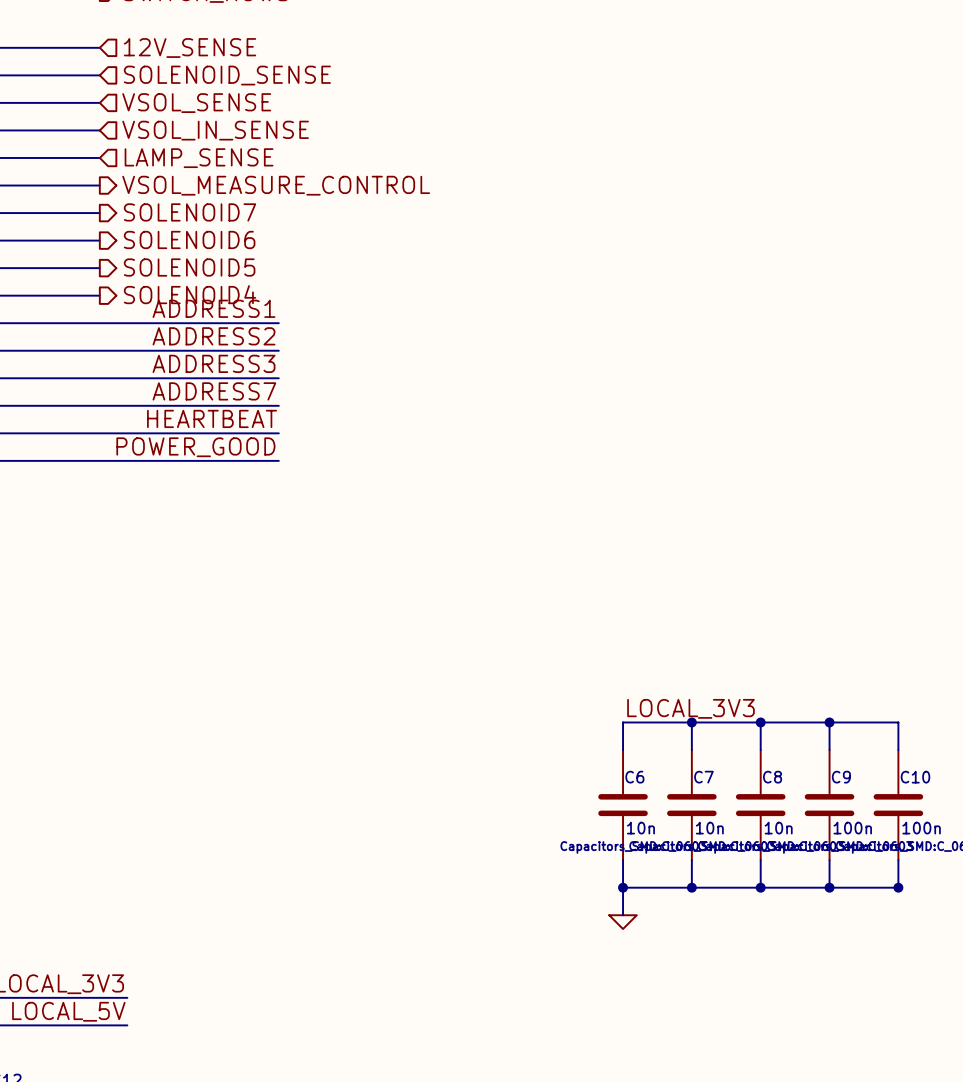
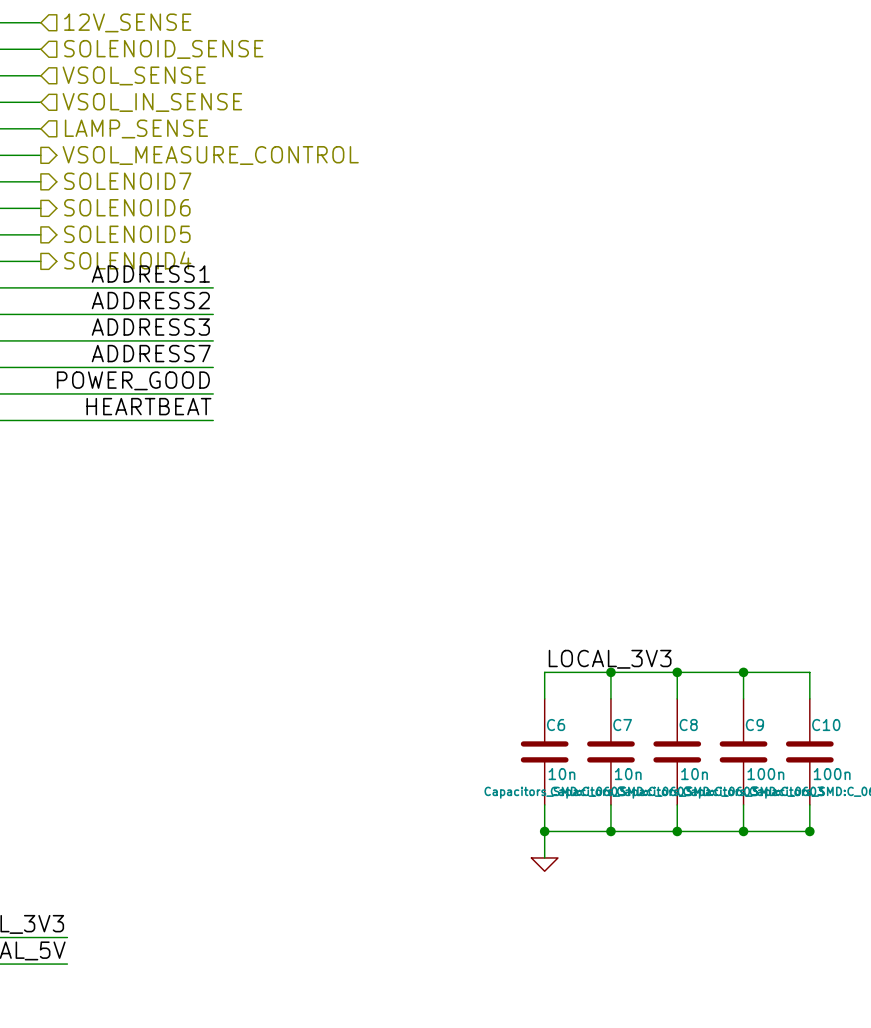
label: HEARTBEAT (212, 418) -> POWER_GOOD (133, 380)
label: POWER_GOOD (195, 447) -> HEARTBEAT (148, 406)

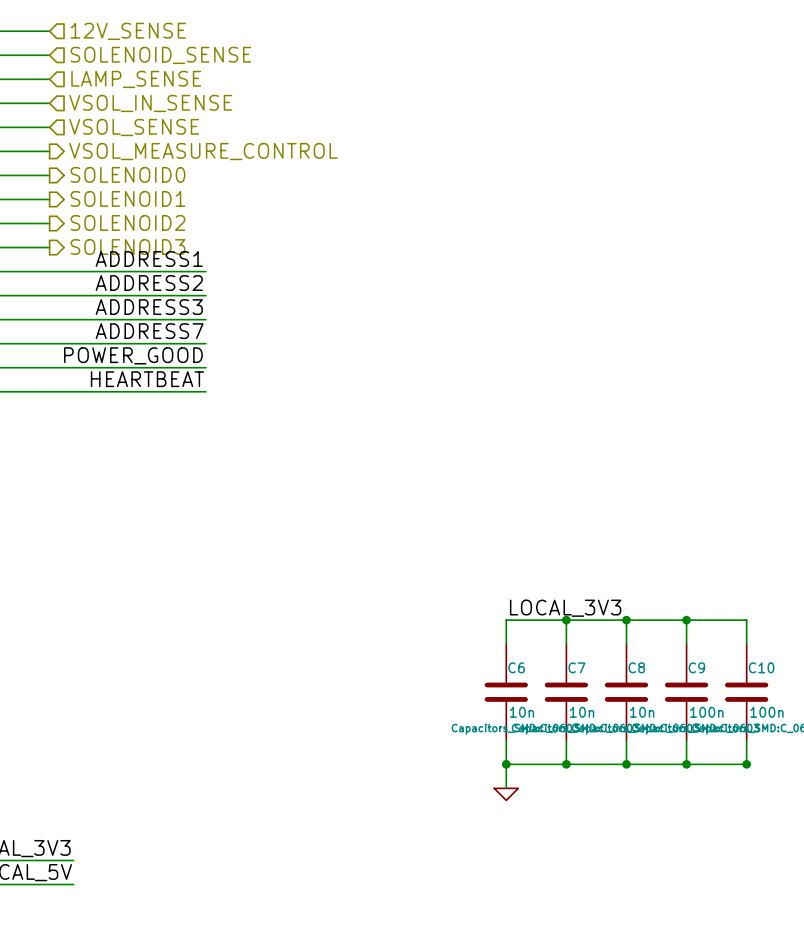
hierarchical label: VSOL_SENSE (134, 75) -> LAMP_SENSE (136, 79)
hierarchical label: LAMP_SENSE (136, 128) -> VSOL_SENSE (134, 127)
hierarchical label: SOLENOID7 (127, 181) -> SOLENOID0 (127, 174)
hierarchical label: SOLENOID6 (127, 207) -> SOLENOID1 (127, 198)
hierarchical label: SOLENOID5 (127, 234) -> SOLENOID2 (127, 222)
hierarchical label: SOLENOID4 (127, 260) -> SOLENOID3 (127, 247)

